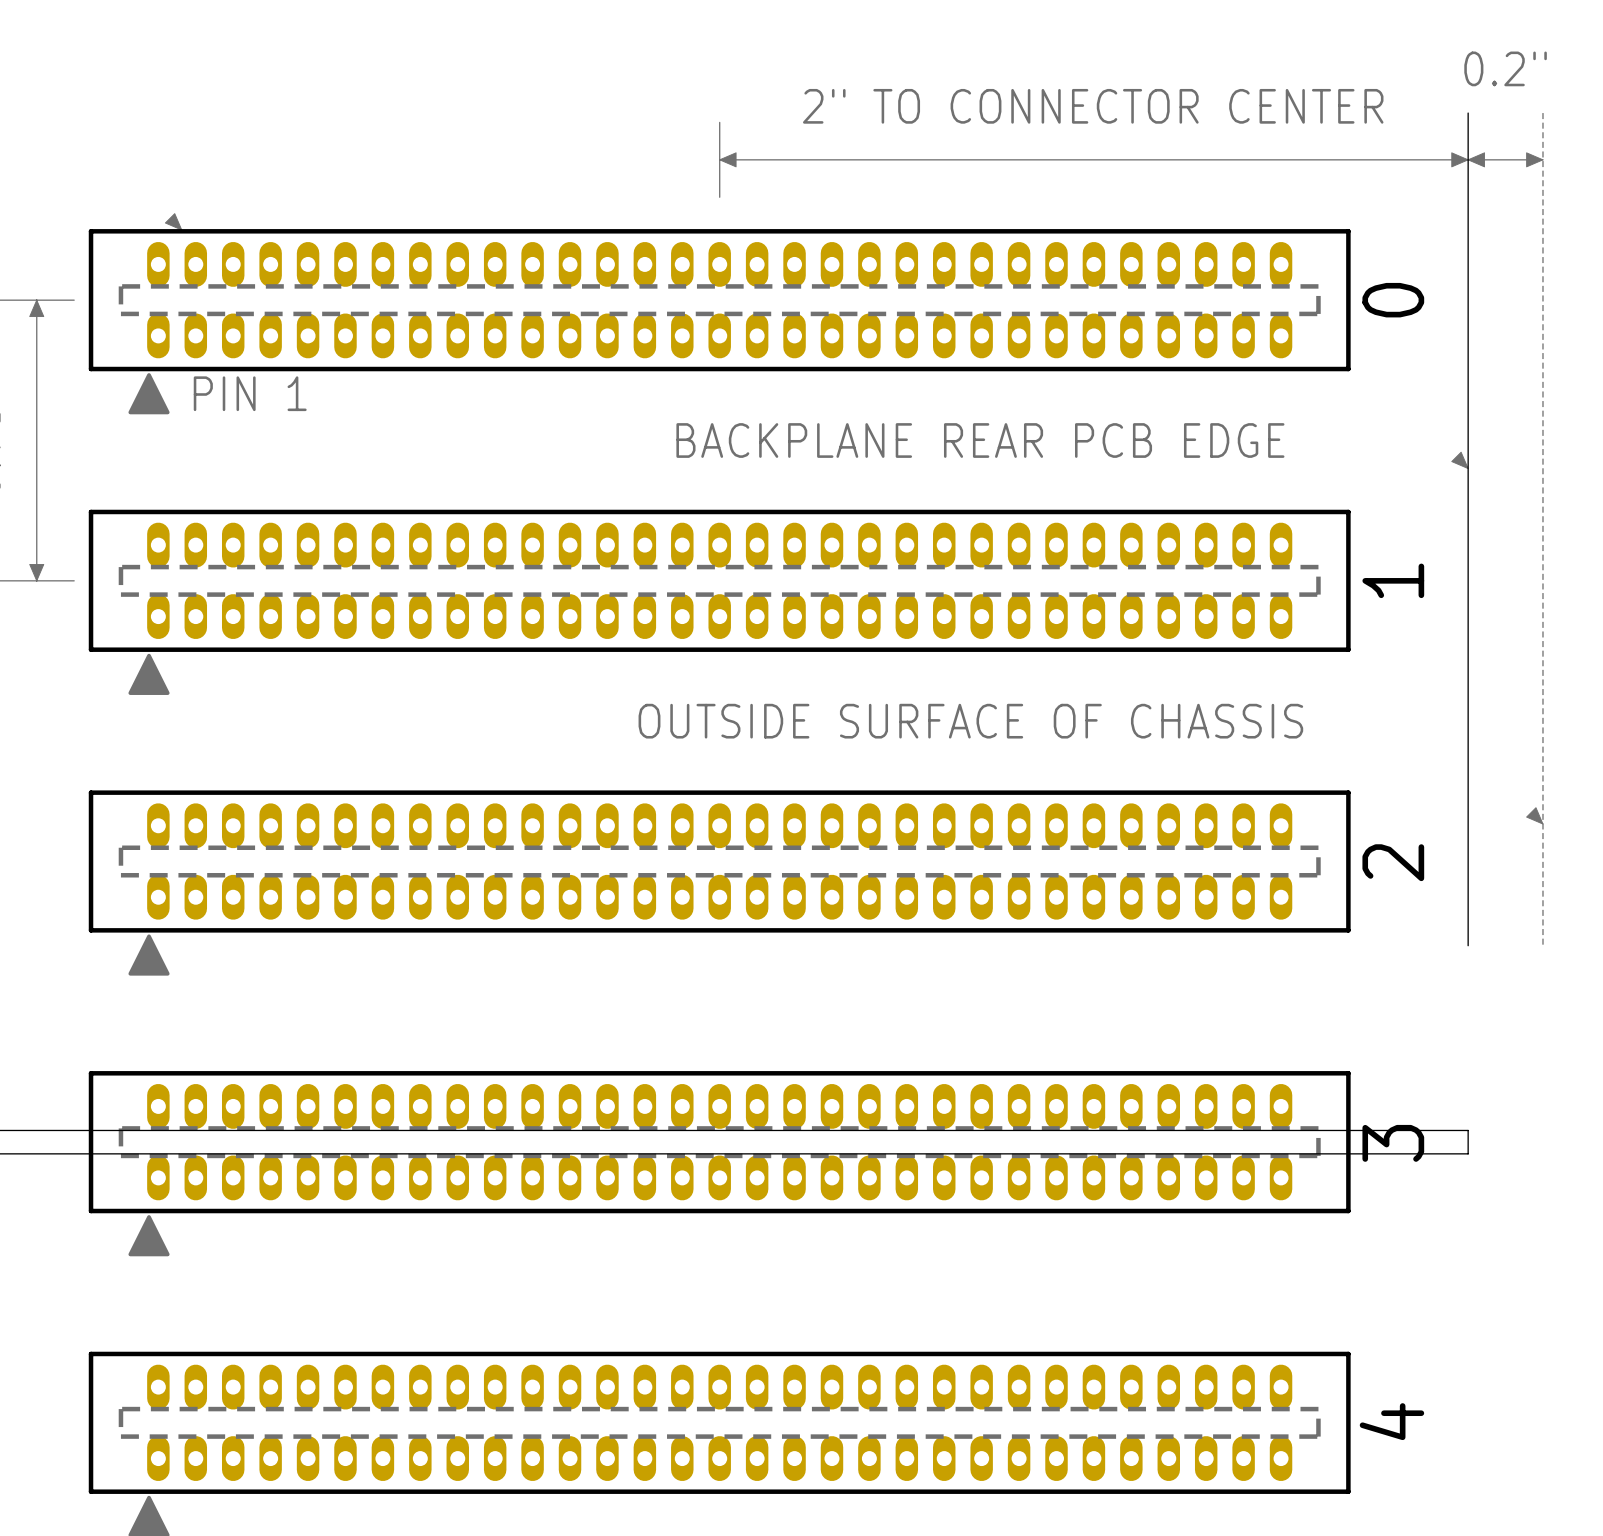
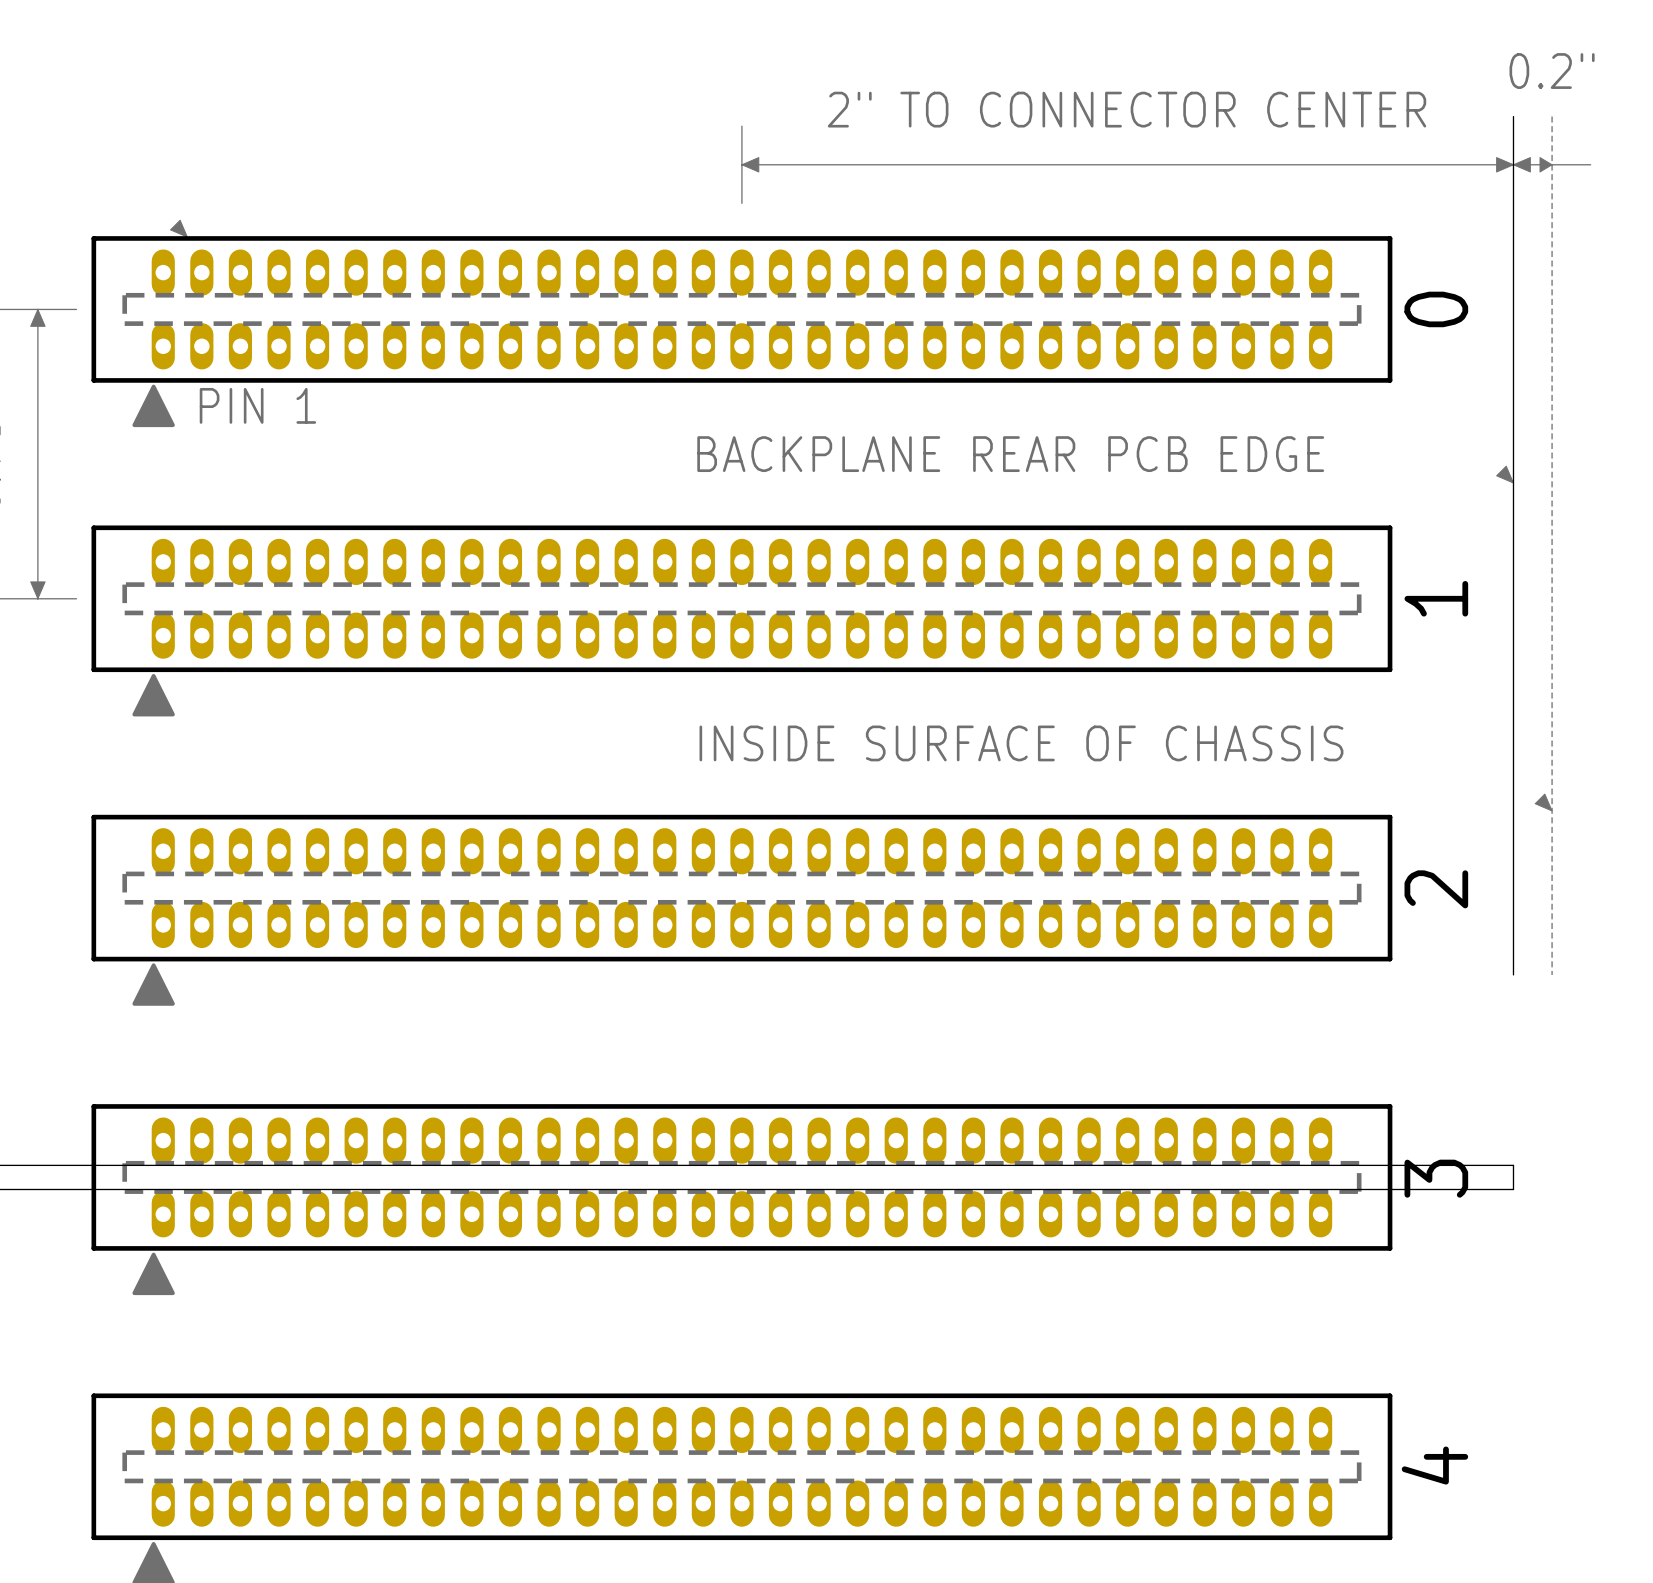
line: (1542, 113) (1542, 945) -> (1552, 116) (1552, 974)
drawing: none -> [1539, 157, 1553, 173]
drawing: [1526, 152, 1544, 168] -> none
text: OUTSIDE SURFACE OF CHASSIS (970, 721) -> INSIDE SURFACE OF CHASSIS (1021, 743)
drawing position: (1534, 815) -> (1543, 802)

